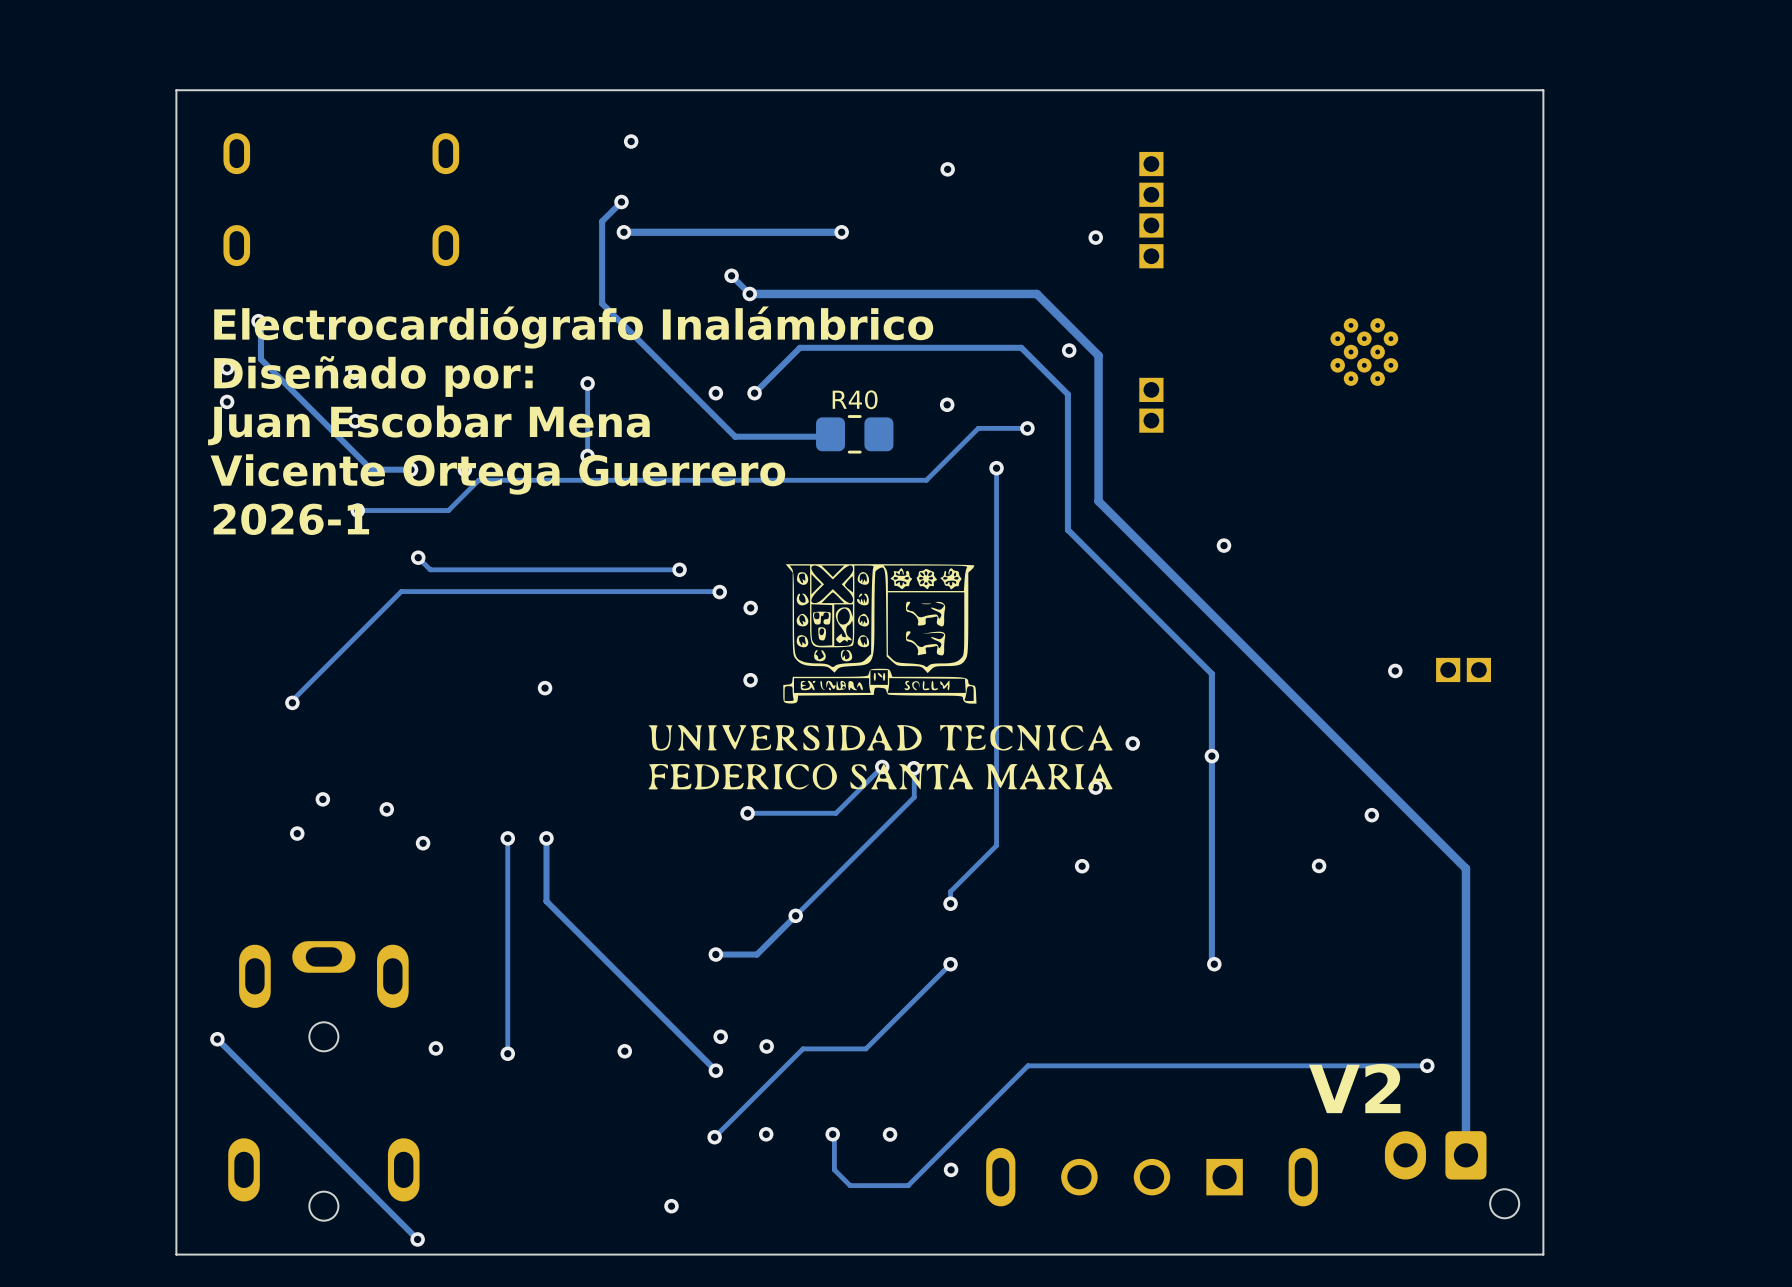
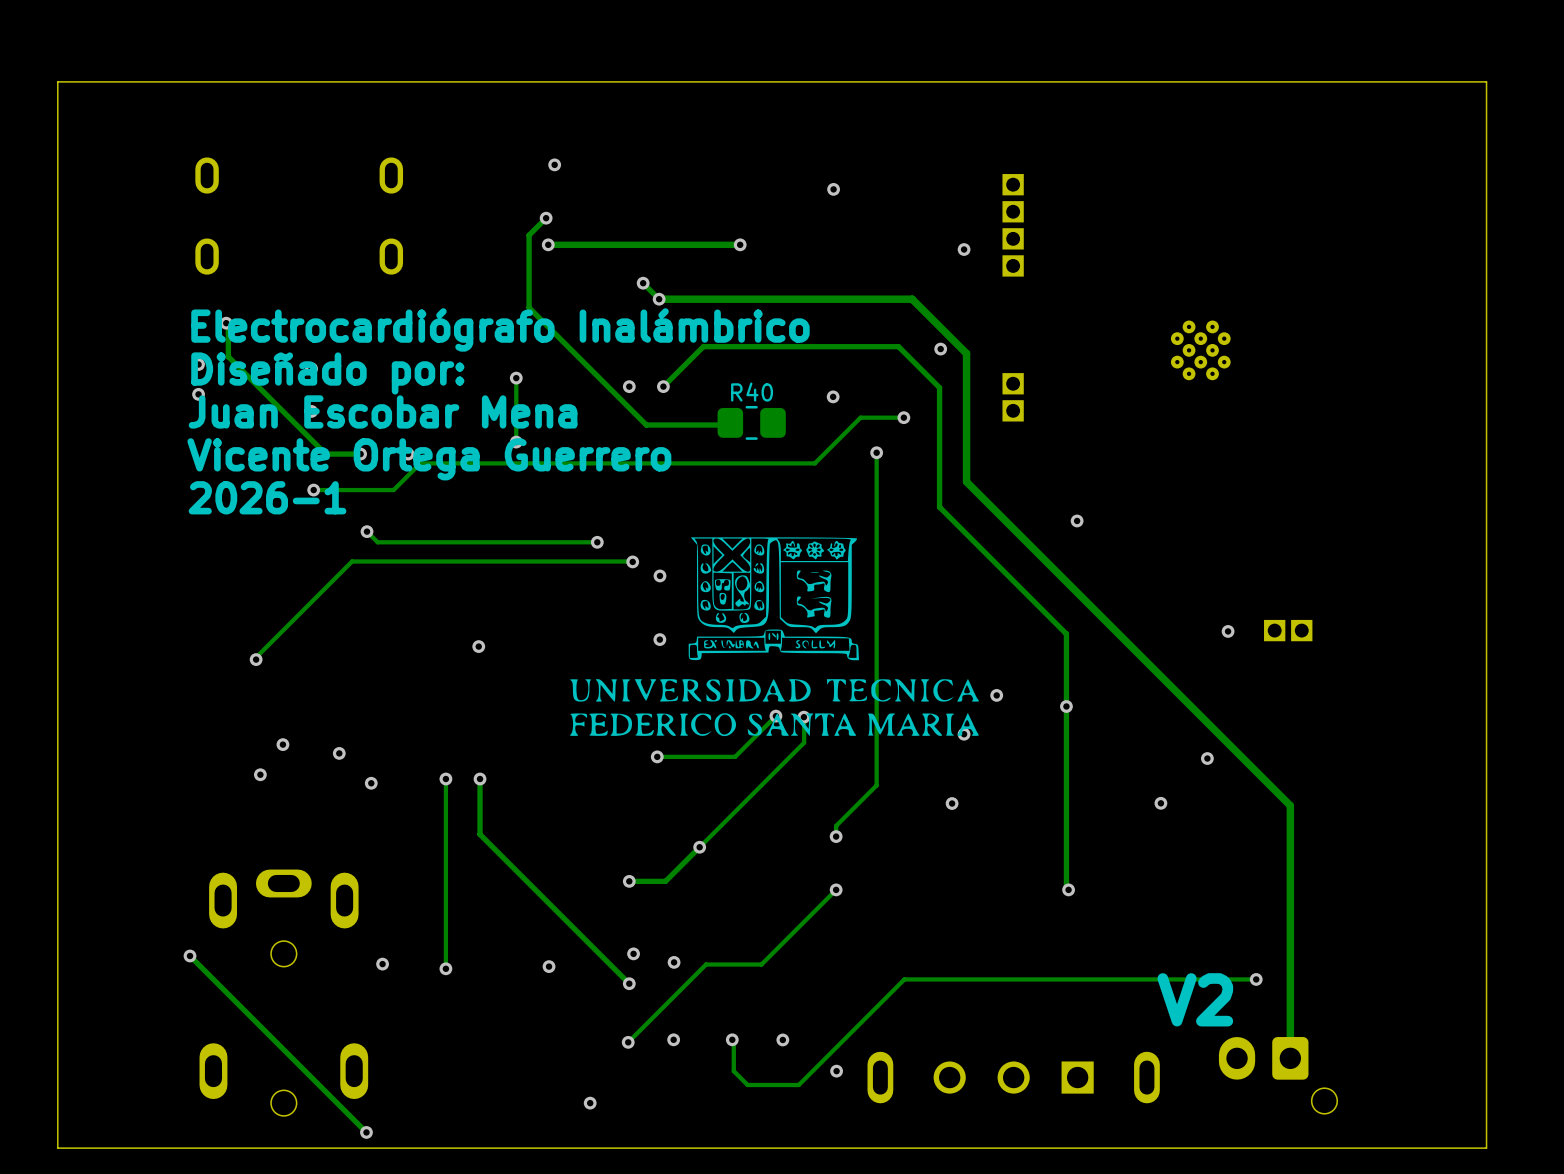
board edge: (1543, 90) (176, 90) (176, 1254) (1543, 1254) (1543, 90) -> (1486, 81) (1486, 1148) (57, 1148) (57, 81) (1486, 81)

